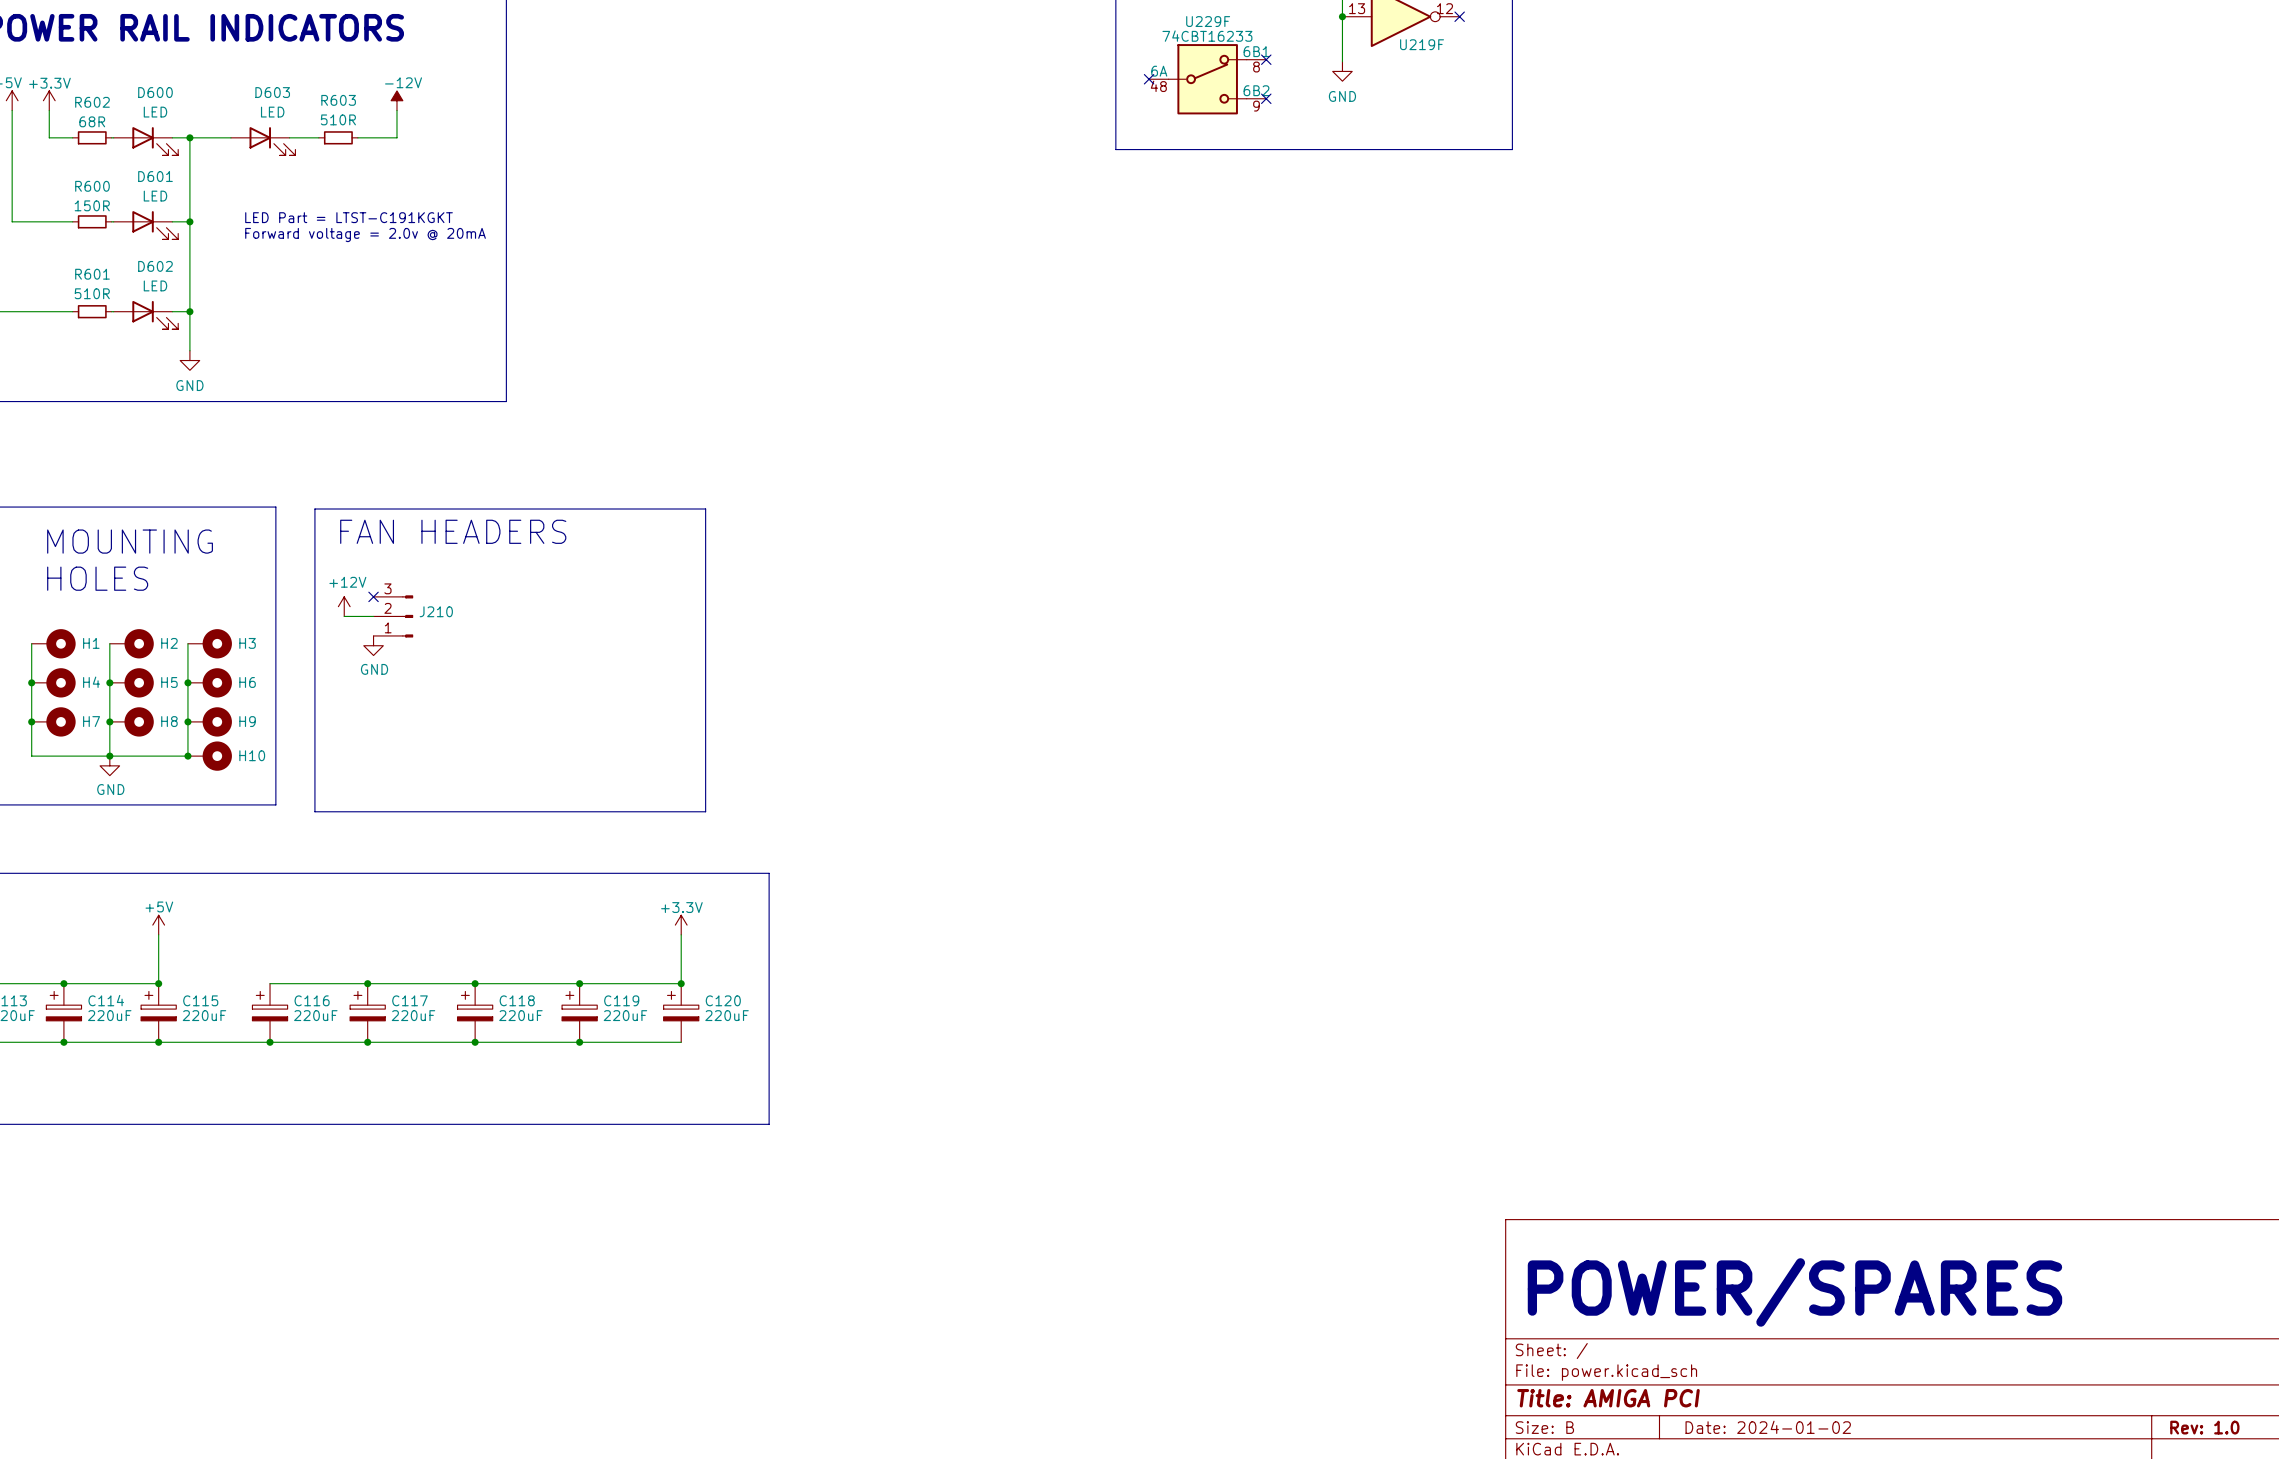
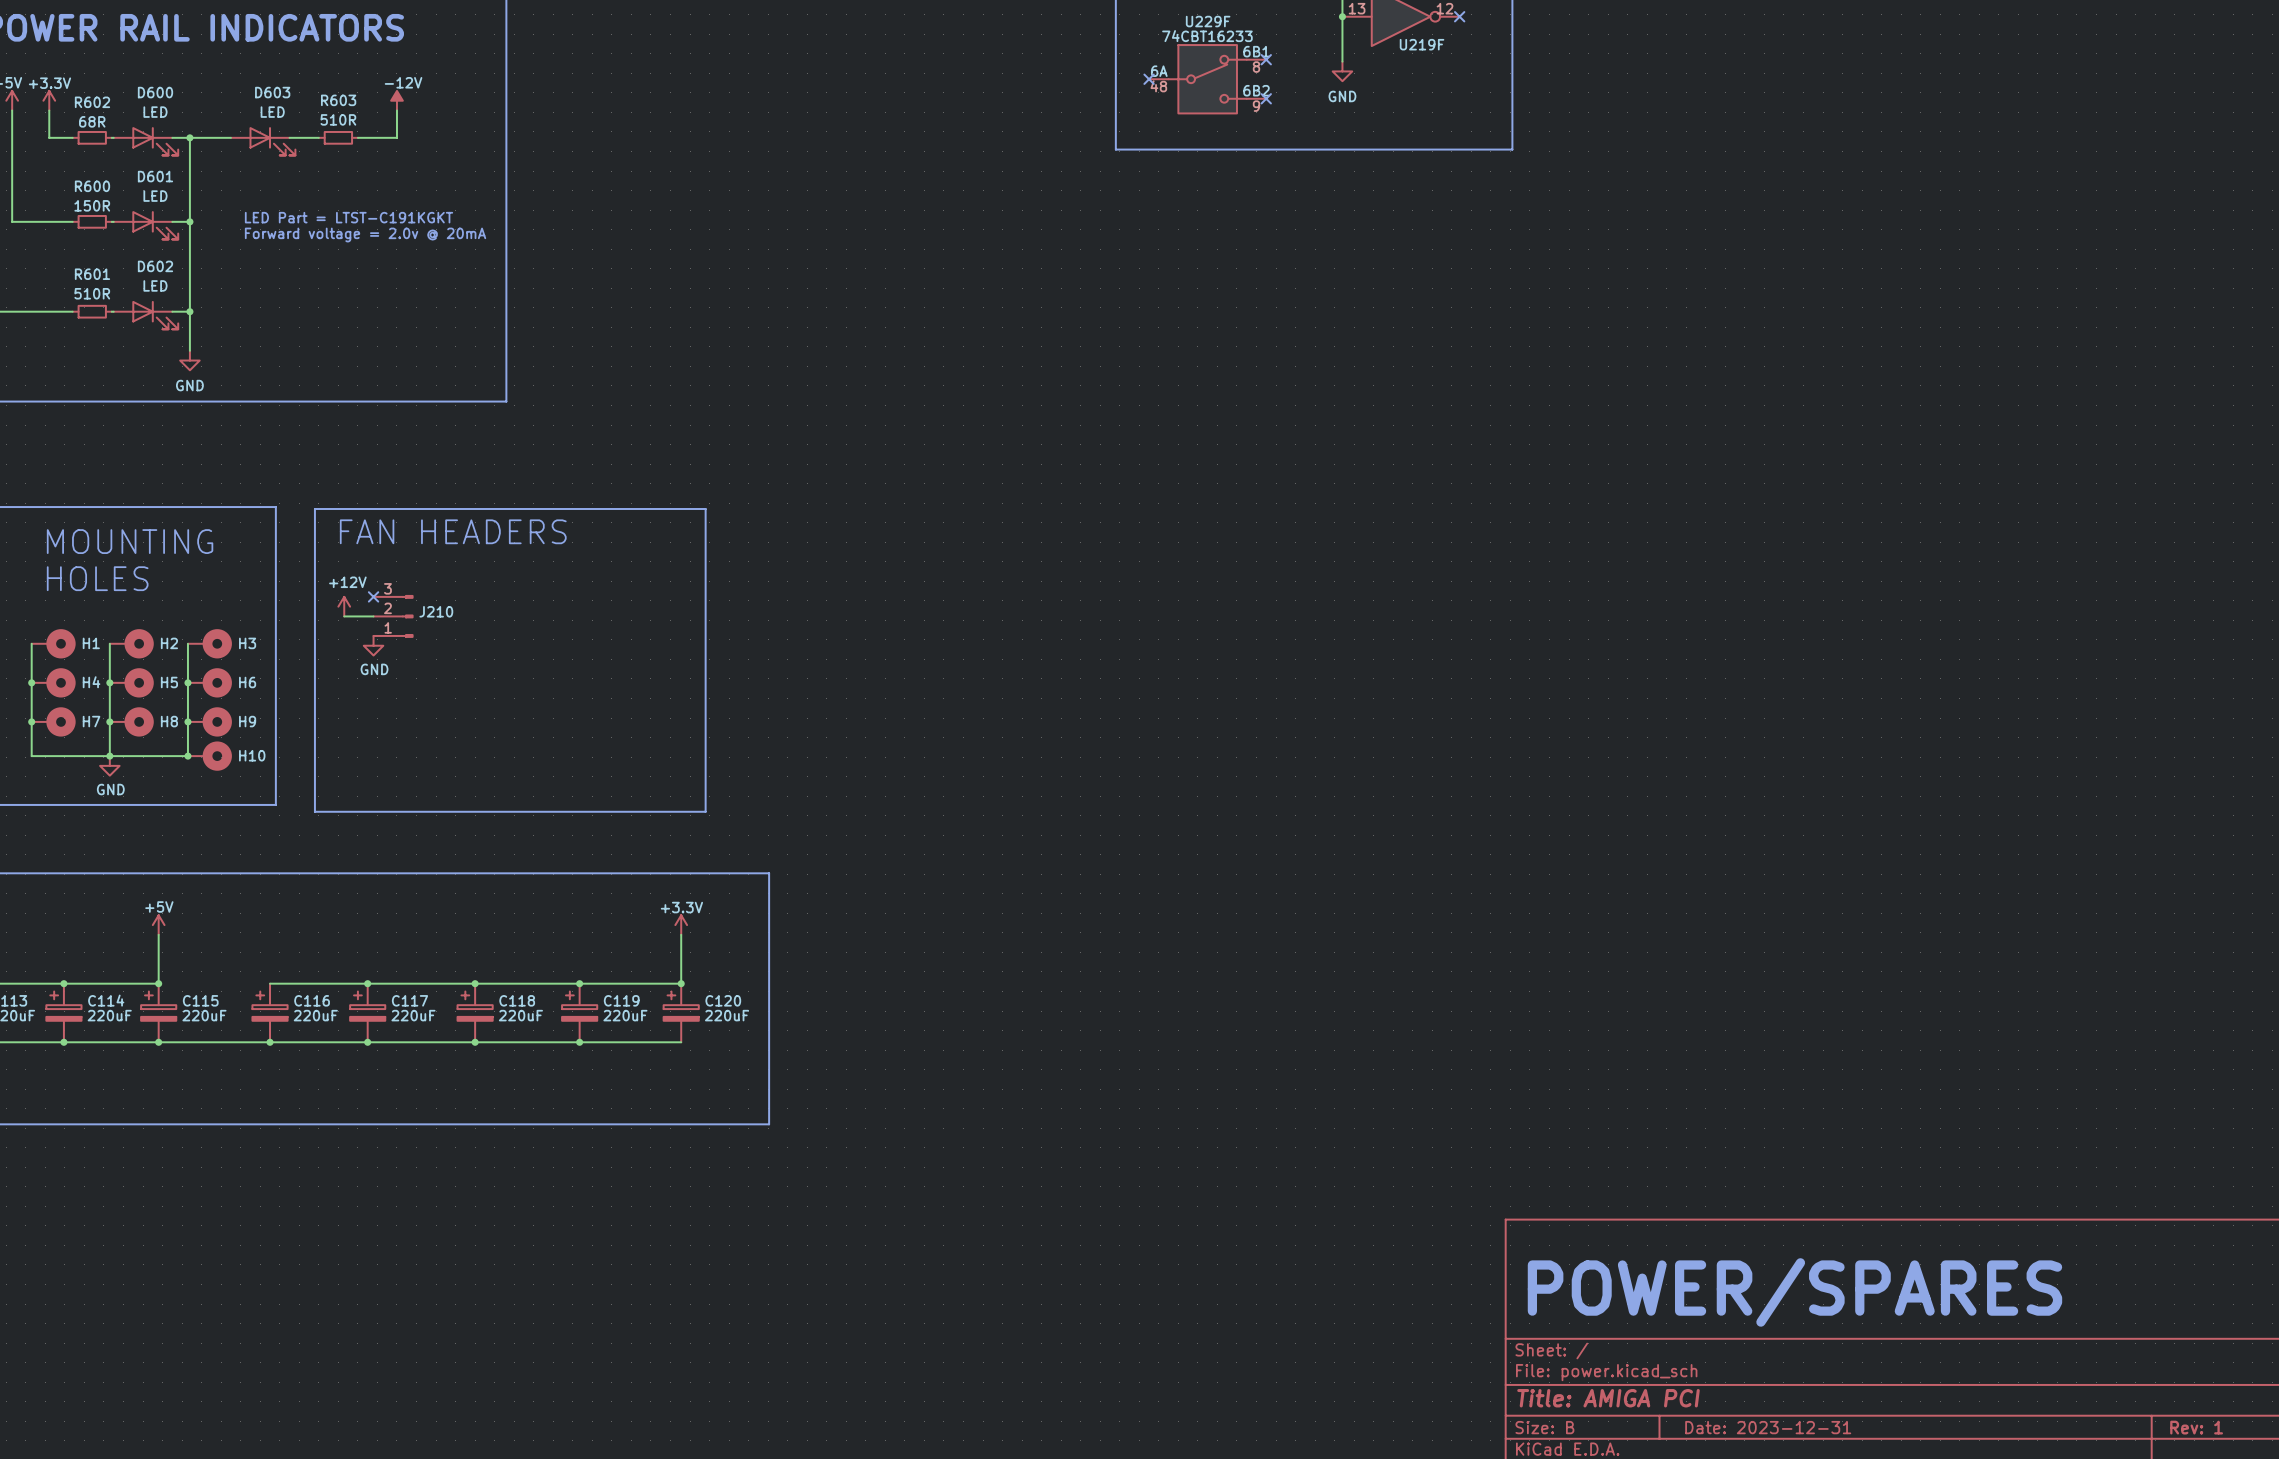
title block: Date: 2024-01-02 (1768, 1427) -> Date: 2023-12-31 (1768, 1427)
title block: Rev: 1.0 (2204, 1427) -> Rev: 1 (2196, 1427)

